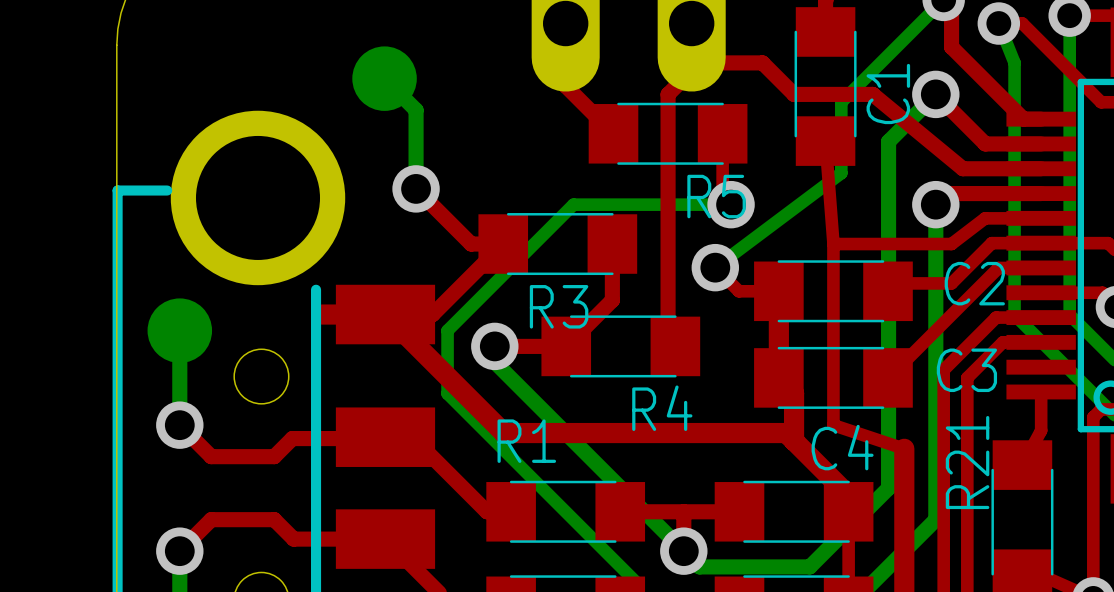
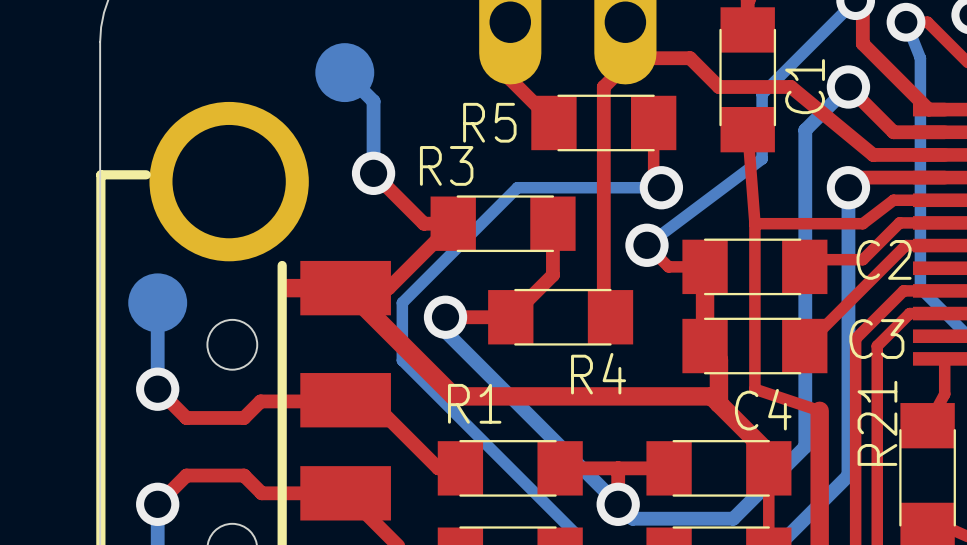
R5 name position: R5 (716, 196) -> R5 (489, 122)
R3 name position: R3 (559, 306) -> R3 (446, 165)

